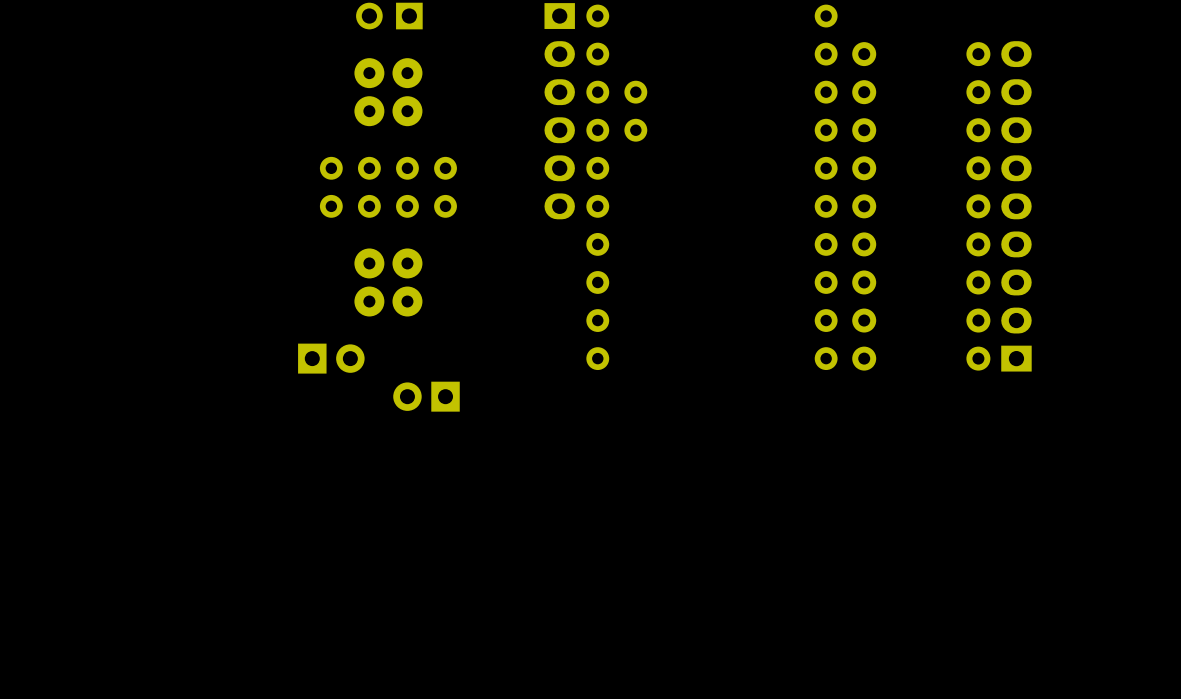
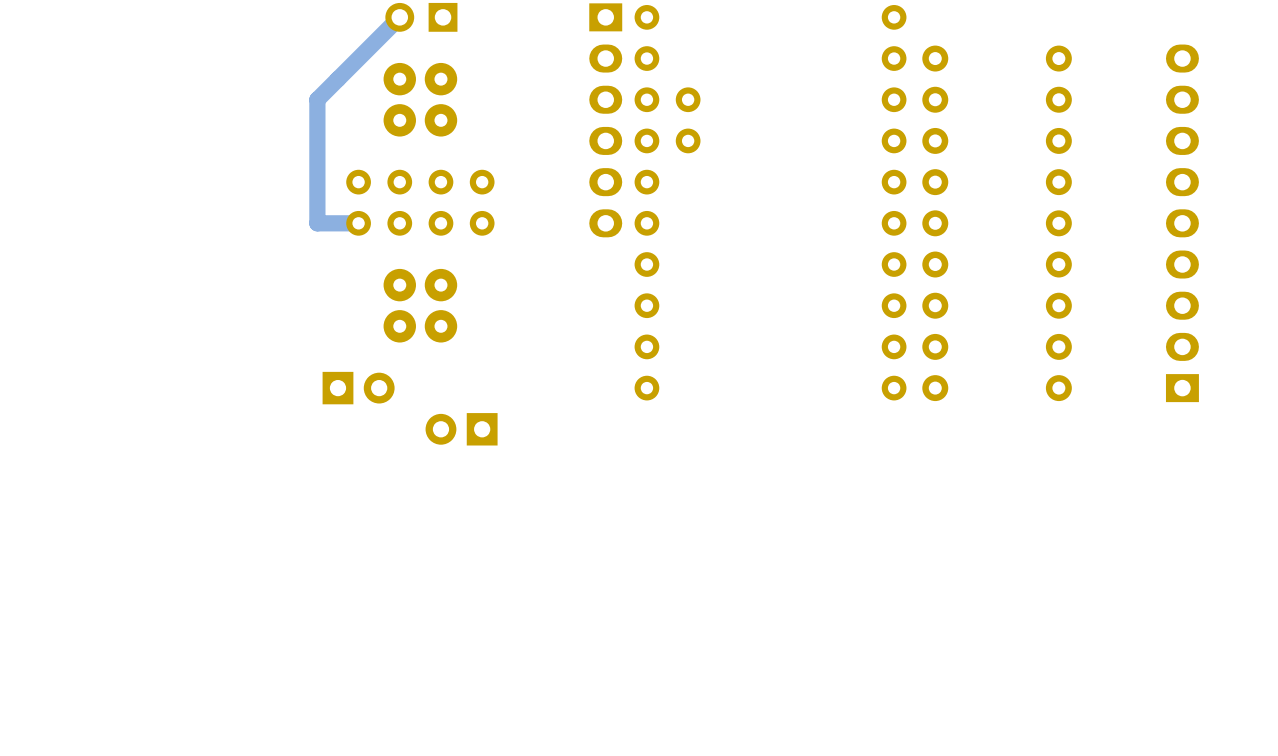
track: none -> (399, 17) (317, 99) (317, 223) (358, 223)
part position: (1016, 206) -> (1182, 223)

